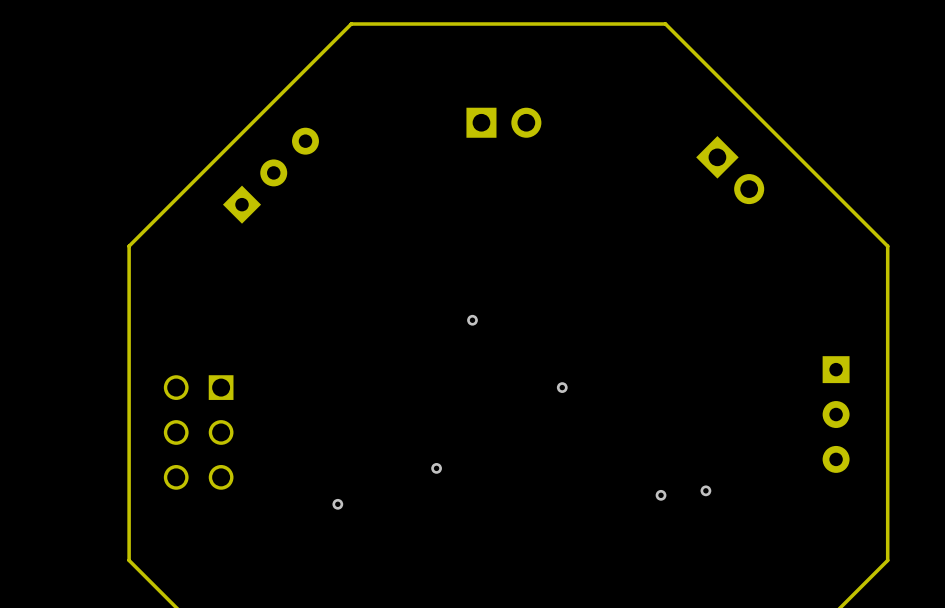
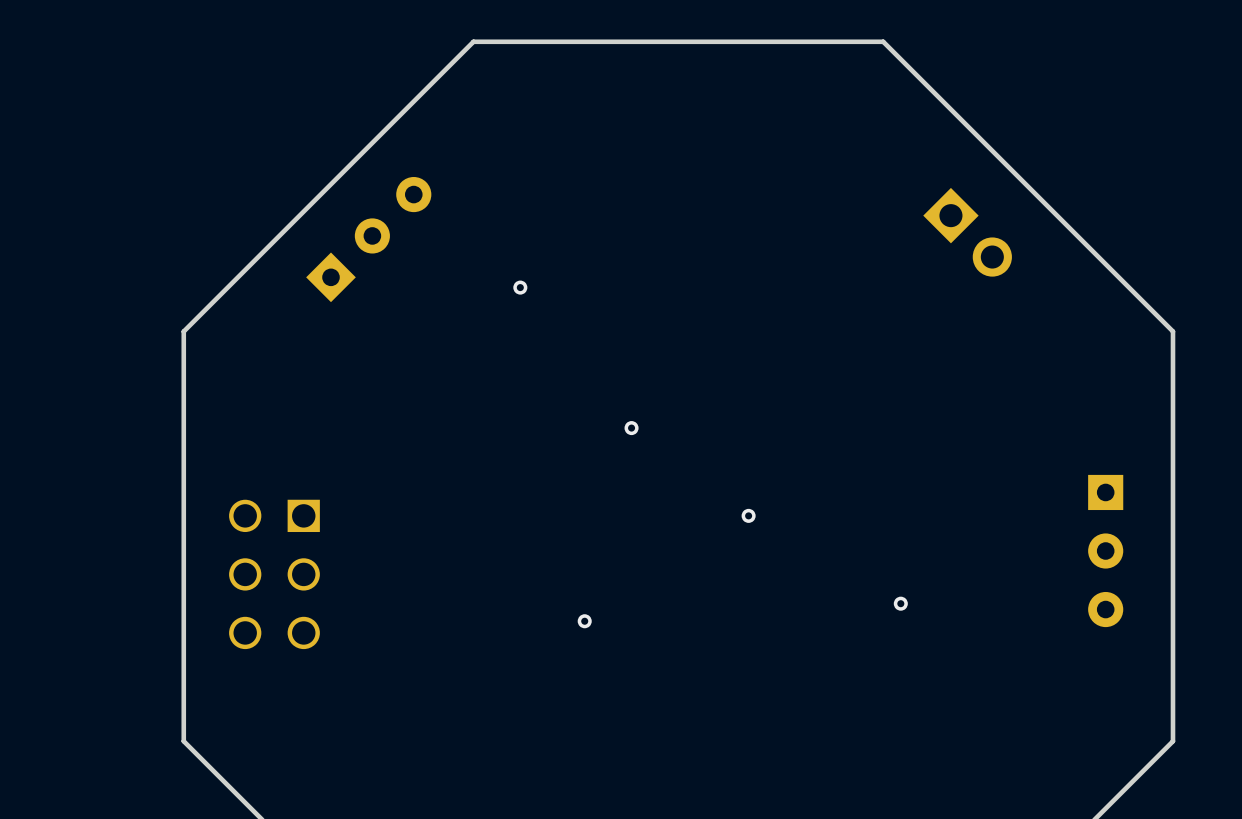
part: (503, 122) -> none
via: none -> (520, 287)
via: none -> (900, 603)
via: (705, 490) -> none
via: (661, 495) -> none
via: (337, 504) -> none

